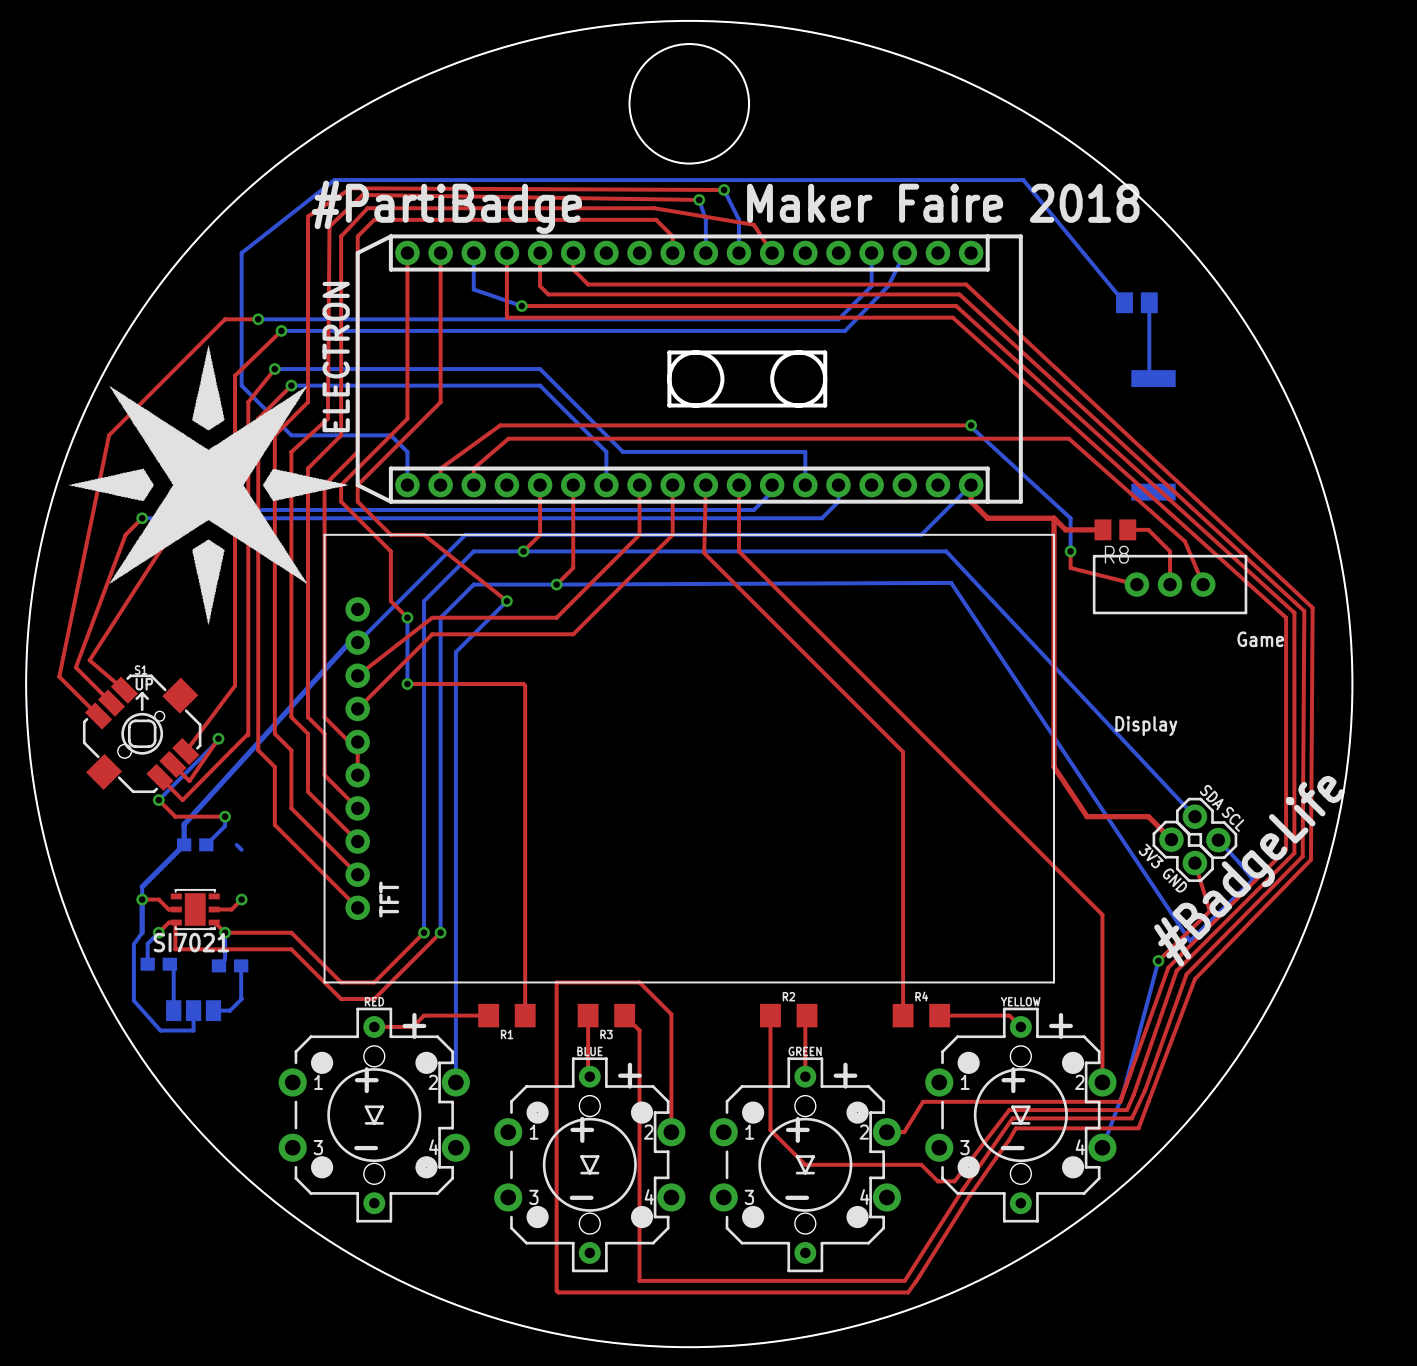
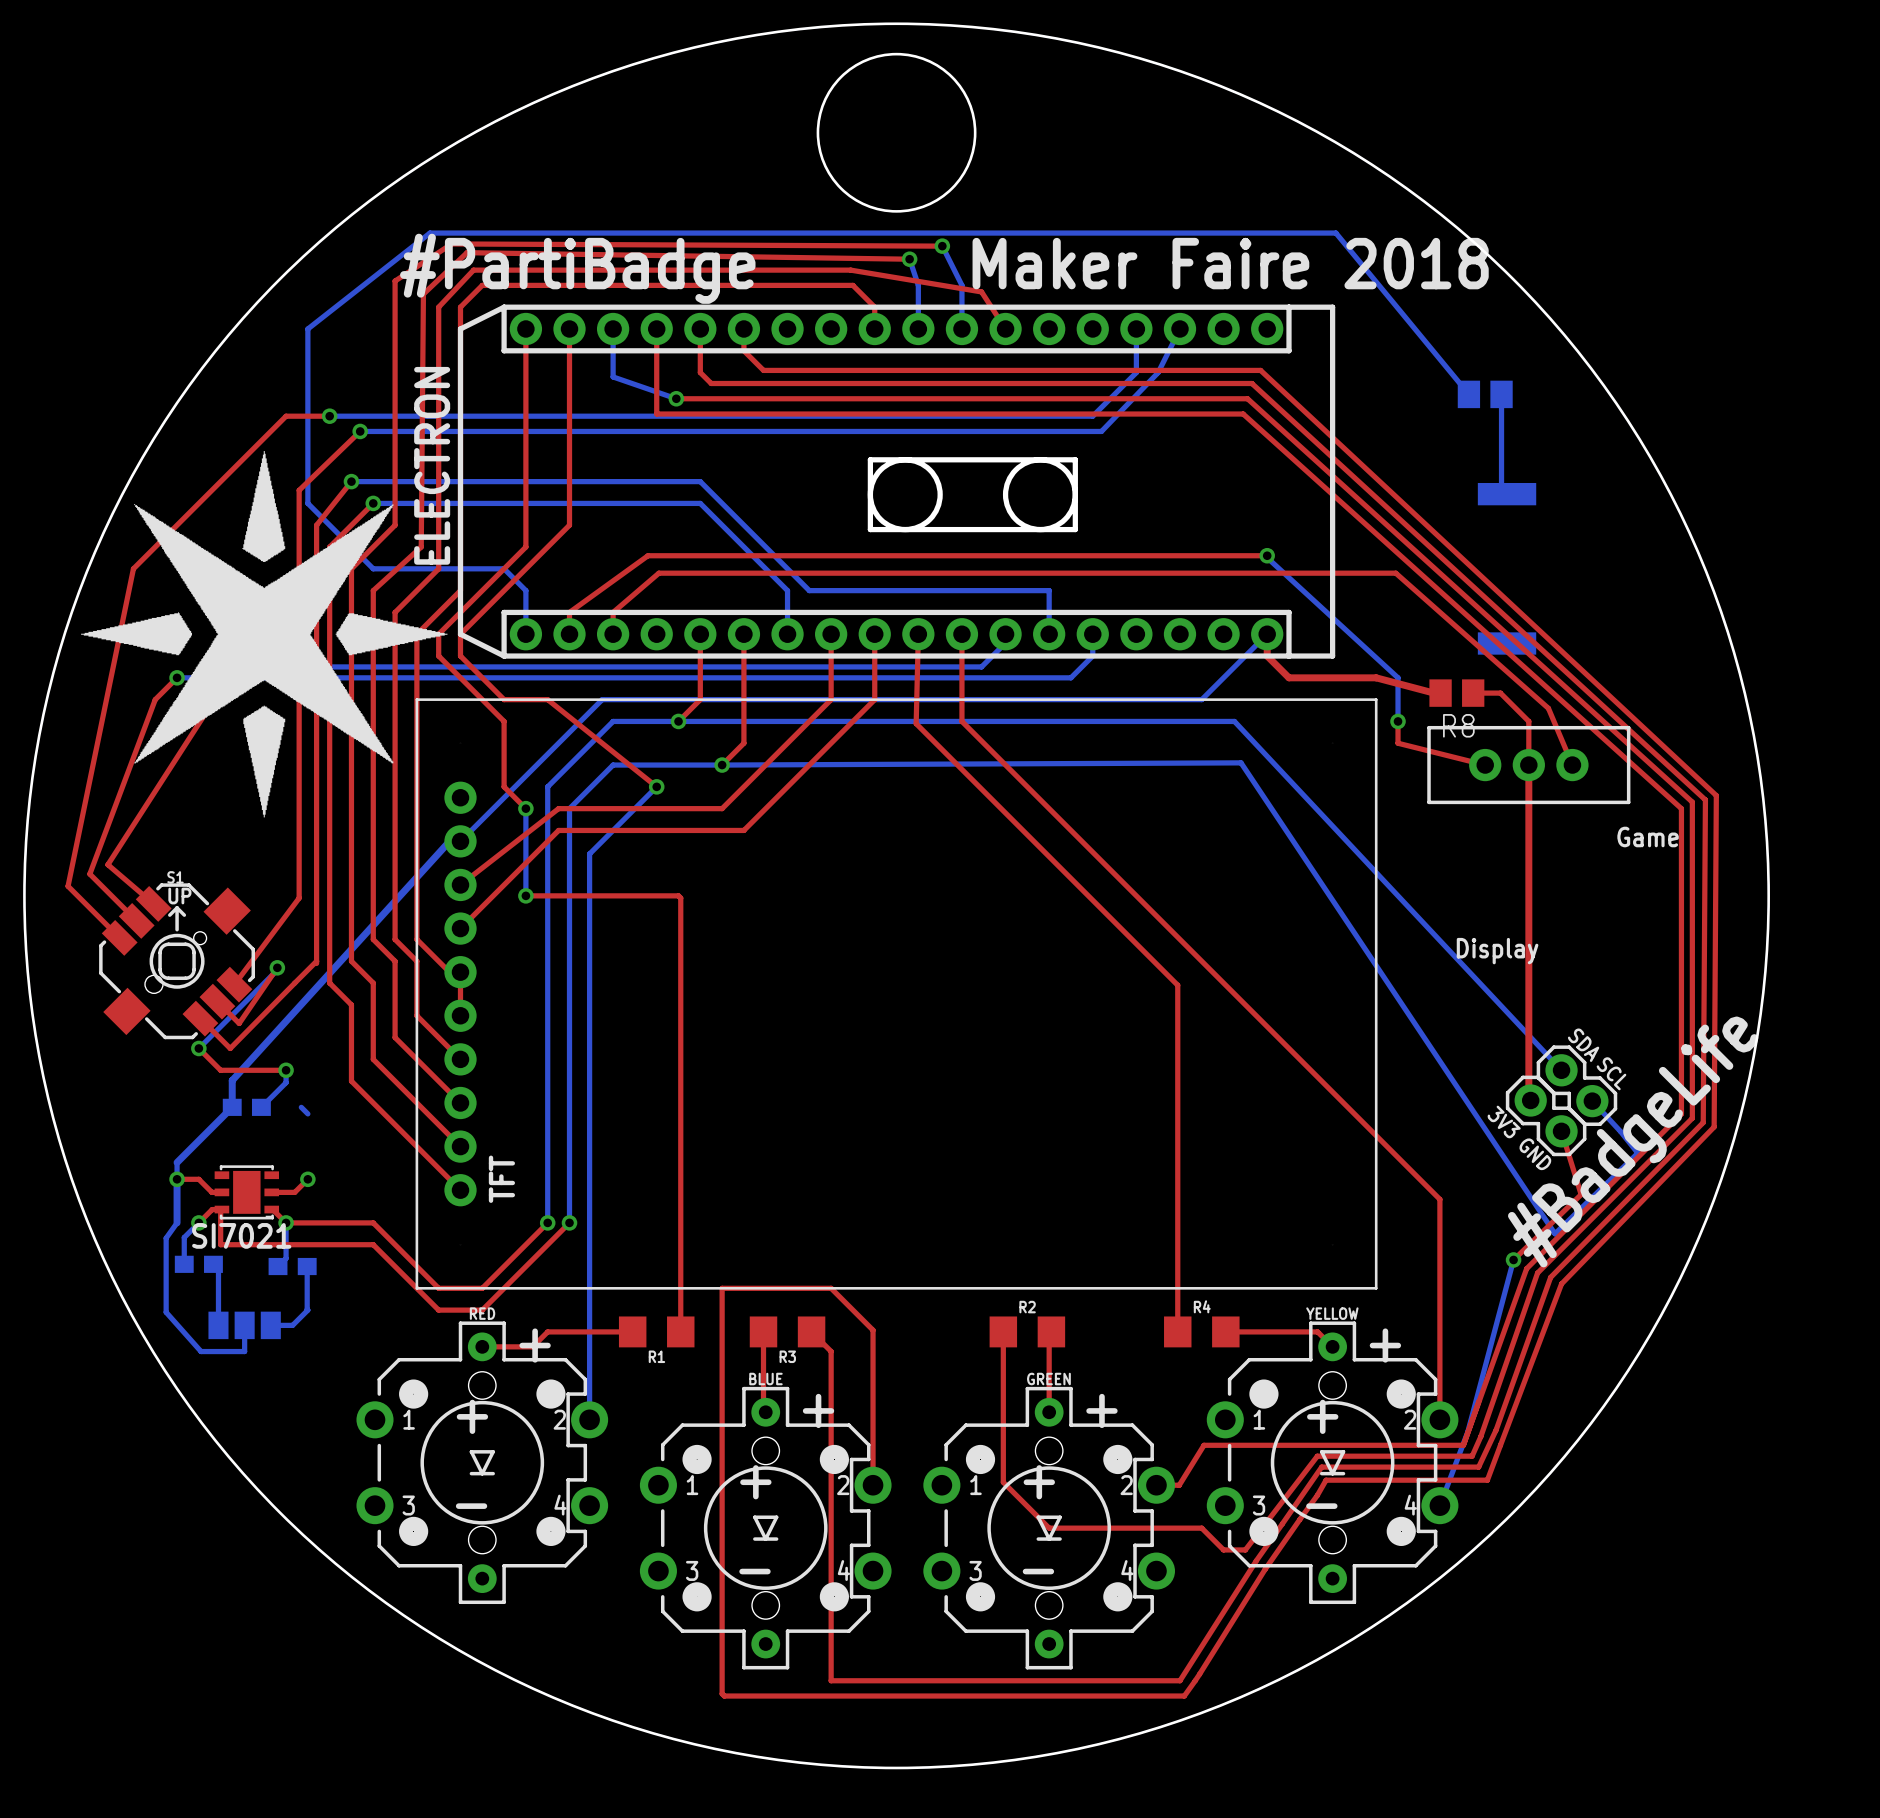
top track: none -> (1376, 677) (1434, 693)
top track: (1102, 529) (1065, 529) (1054, 518) (1054, 766) (1087, 816) (1148, 816) (1171, 839) -> none
top track: none -> (1528, 765) (1528, 1098)

